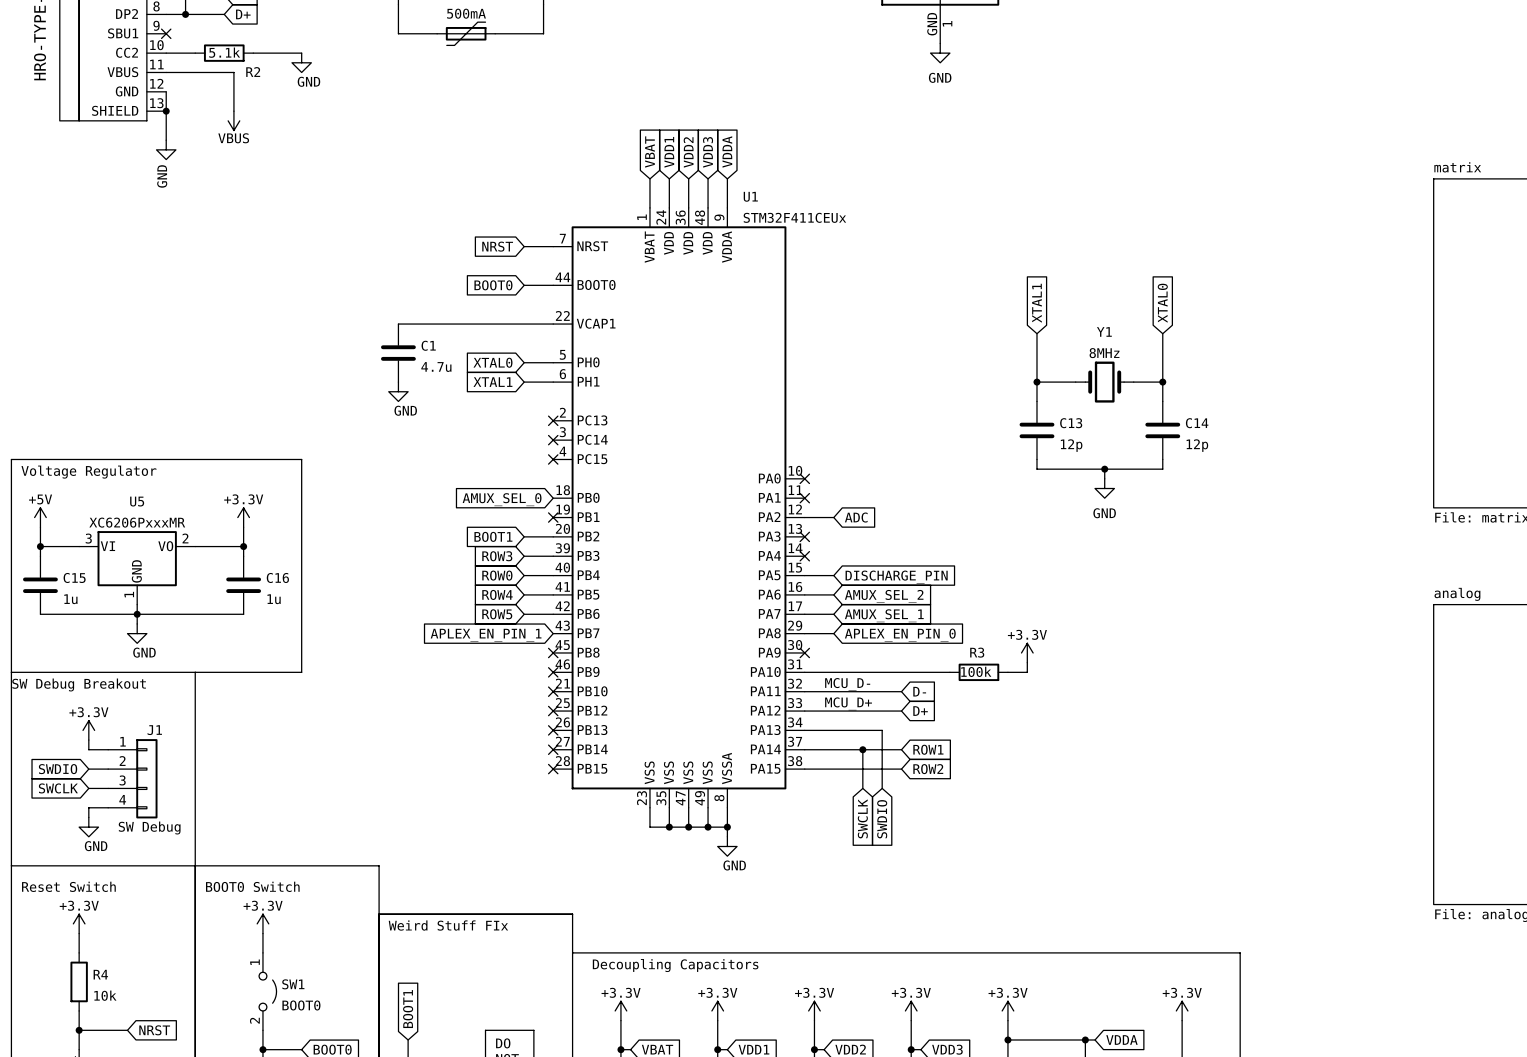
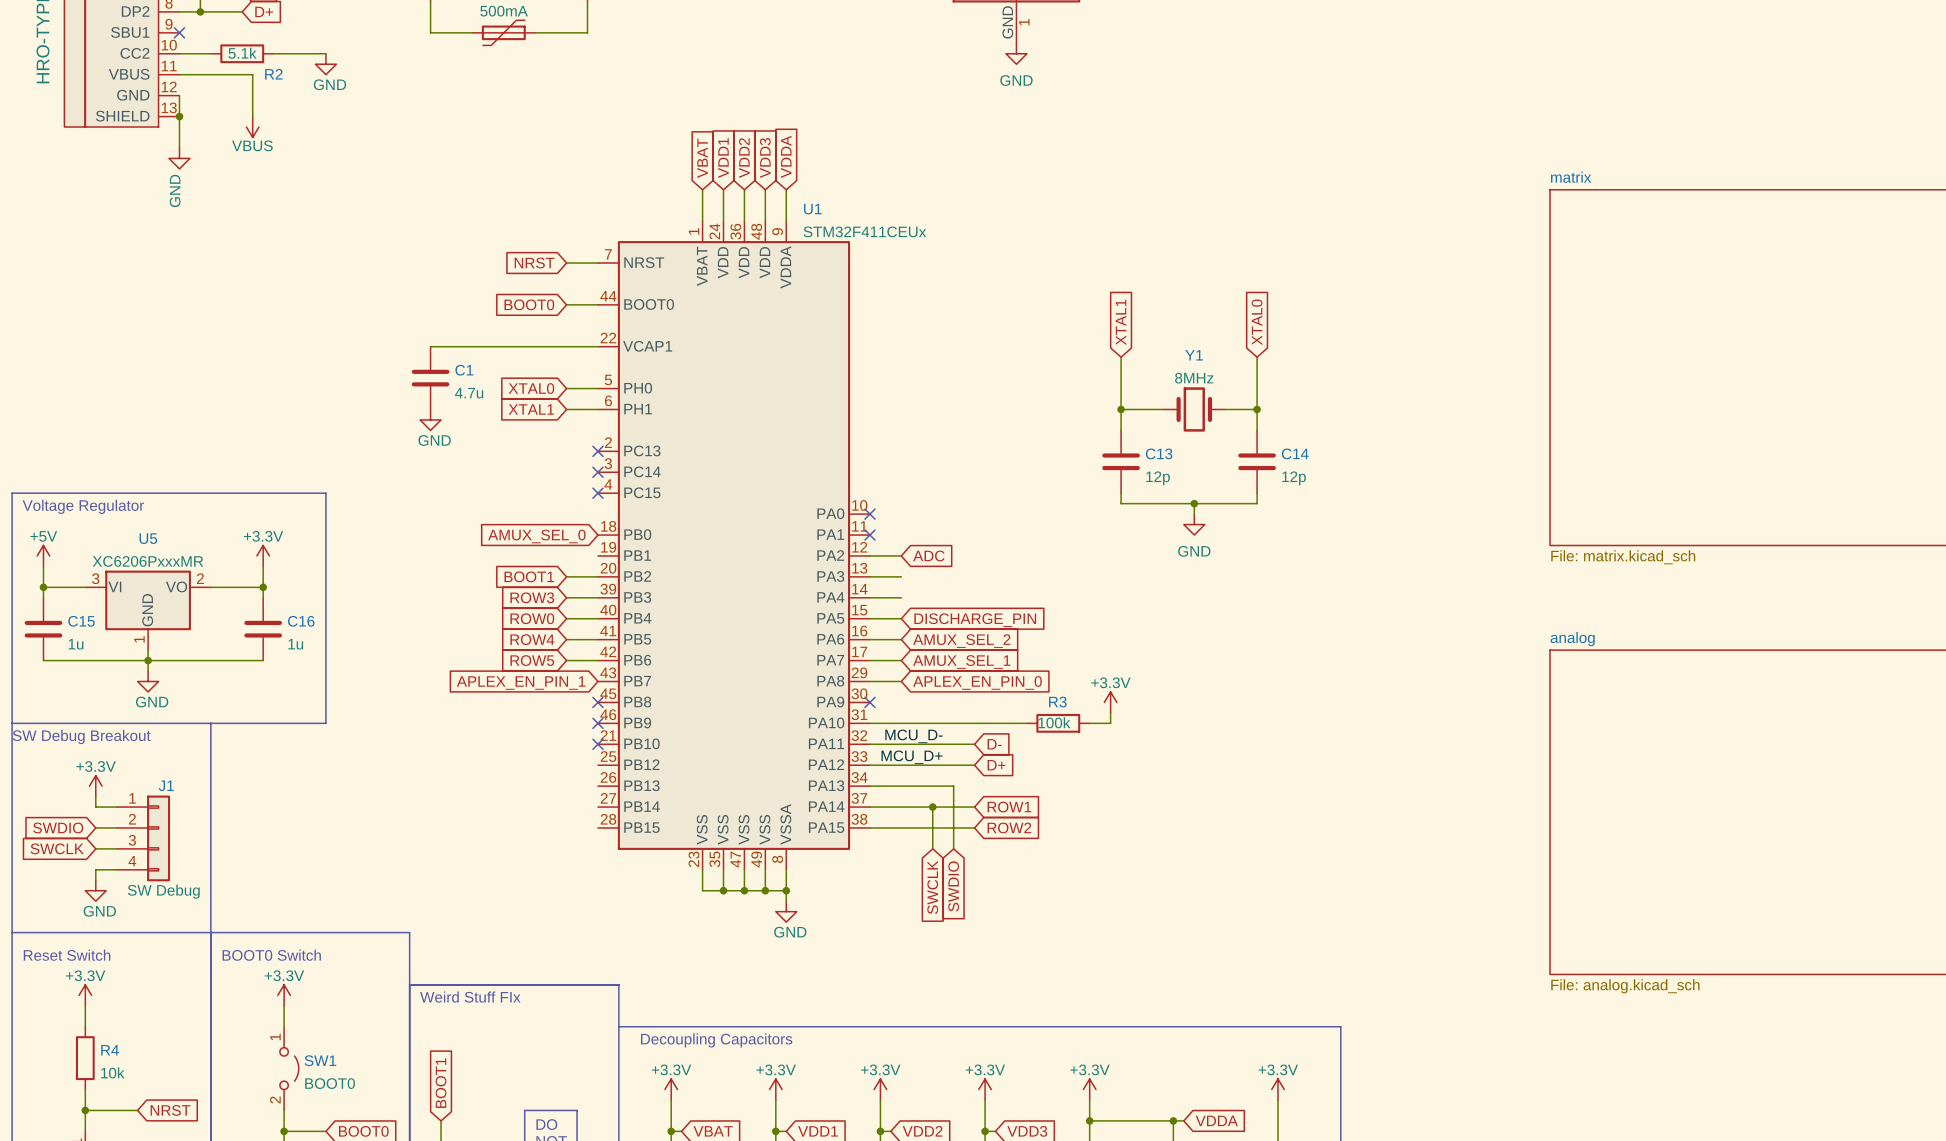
no-connect mark: (553, 517) -> none
wire: none -> (869, 576) (901, 576)
no-connect mark: (804, 536) -> none
wire: none -> (869, 597) (901, 597)
no-connect mark: (804, 556) -> none
no-connect mark: (553, 711) -> none
no-connect mark: (553, 730) -> none
no-connect mark: (553, 749) -> none
no-connect mark: (553, 769) -> none

